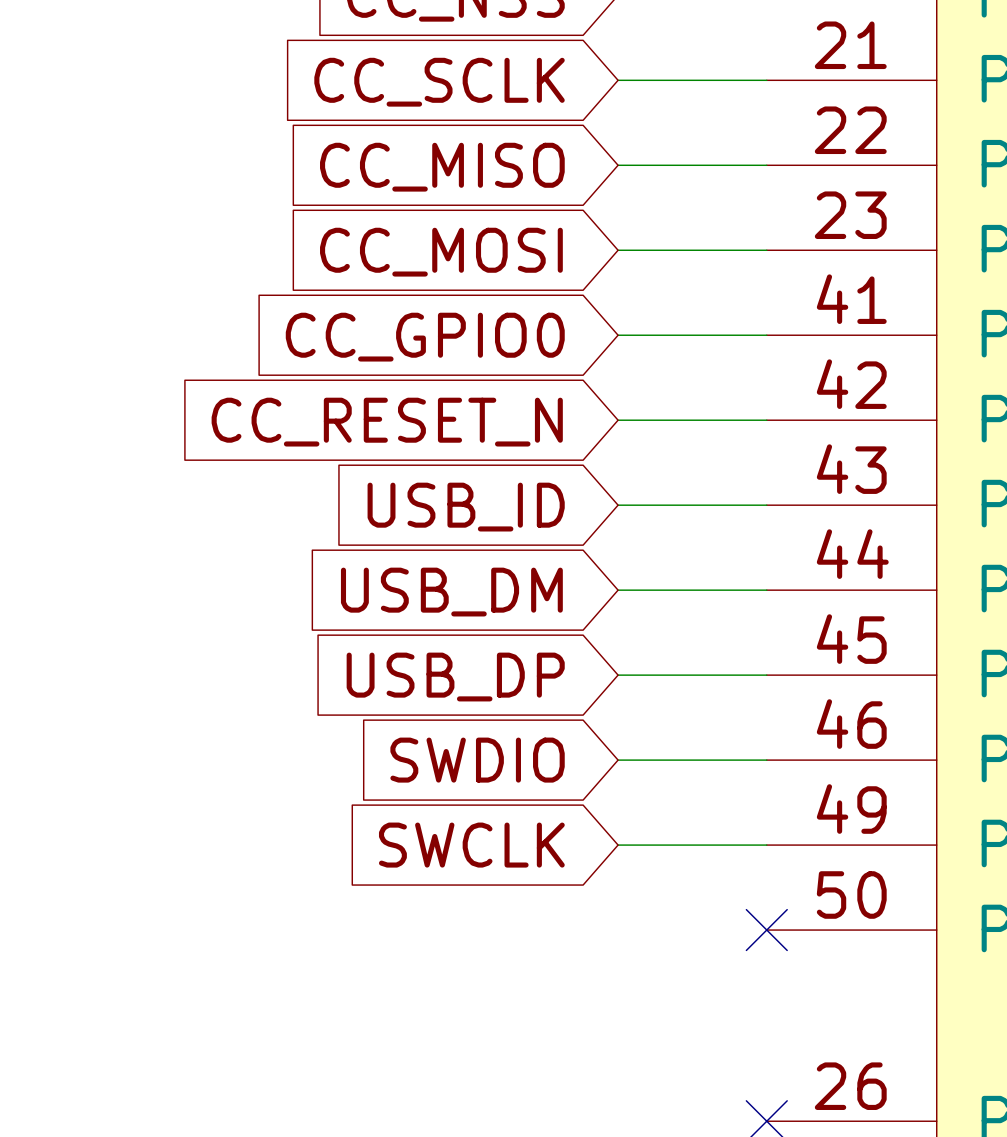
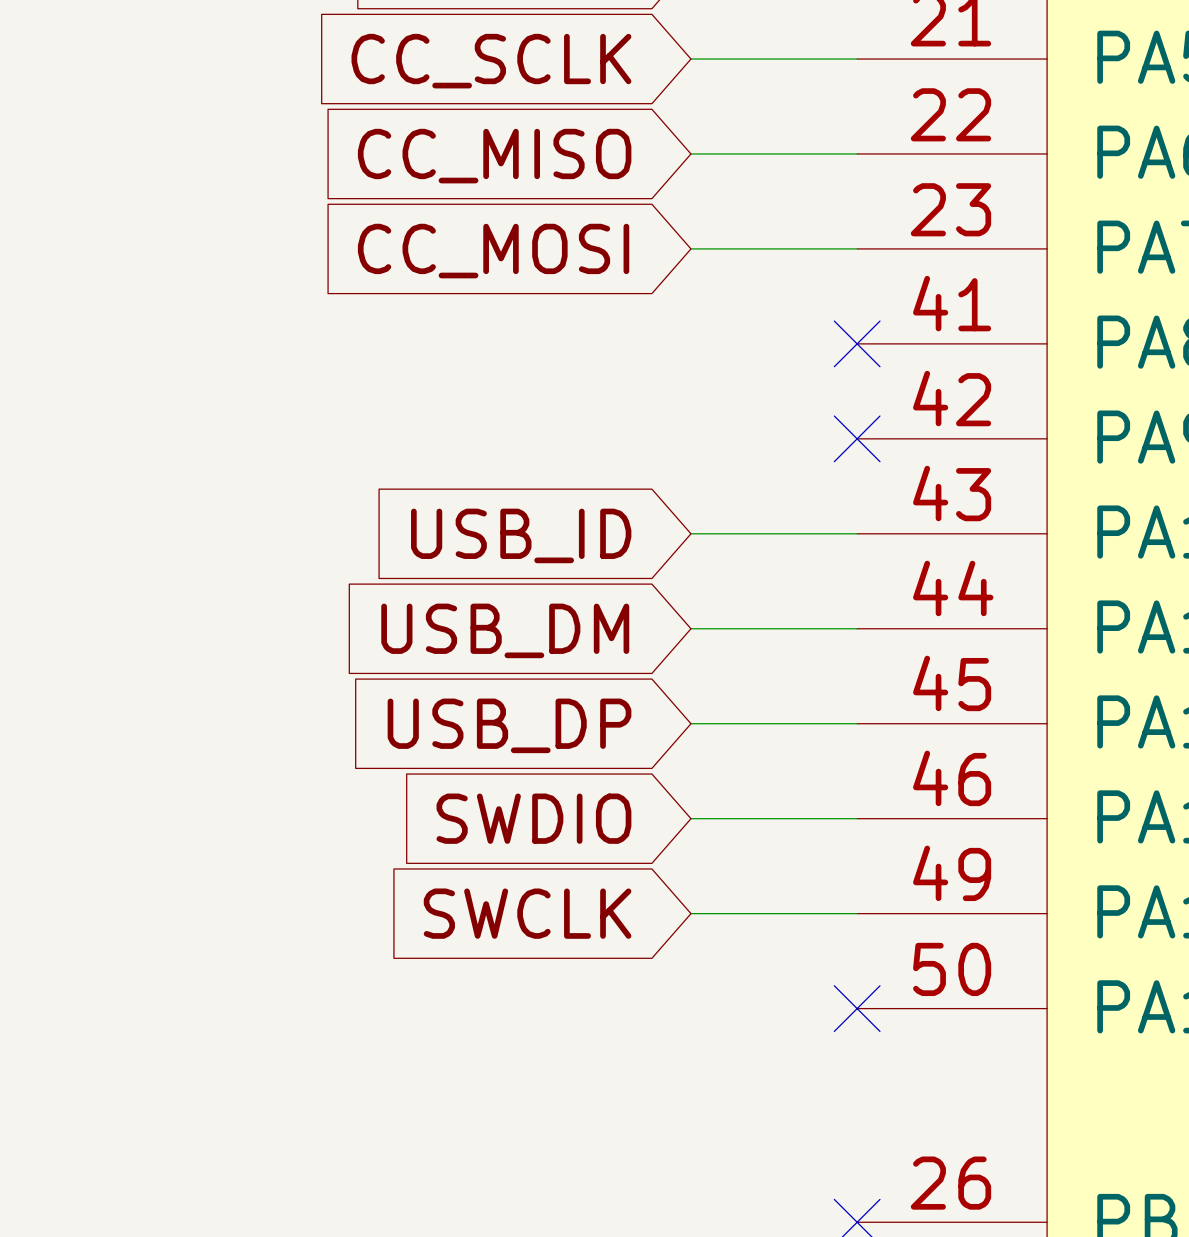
wire: (618, 335) (766, 335) -> none
no-connect mark: none -> (857, 343)
global label: CC_GPIO0 (425, 337) -> none
wire: (618, 420) (766, 420) -> none
no-connect mark: none -> (857, 438)
global label: CC_RESET_N (387, 422) -> none

